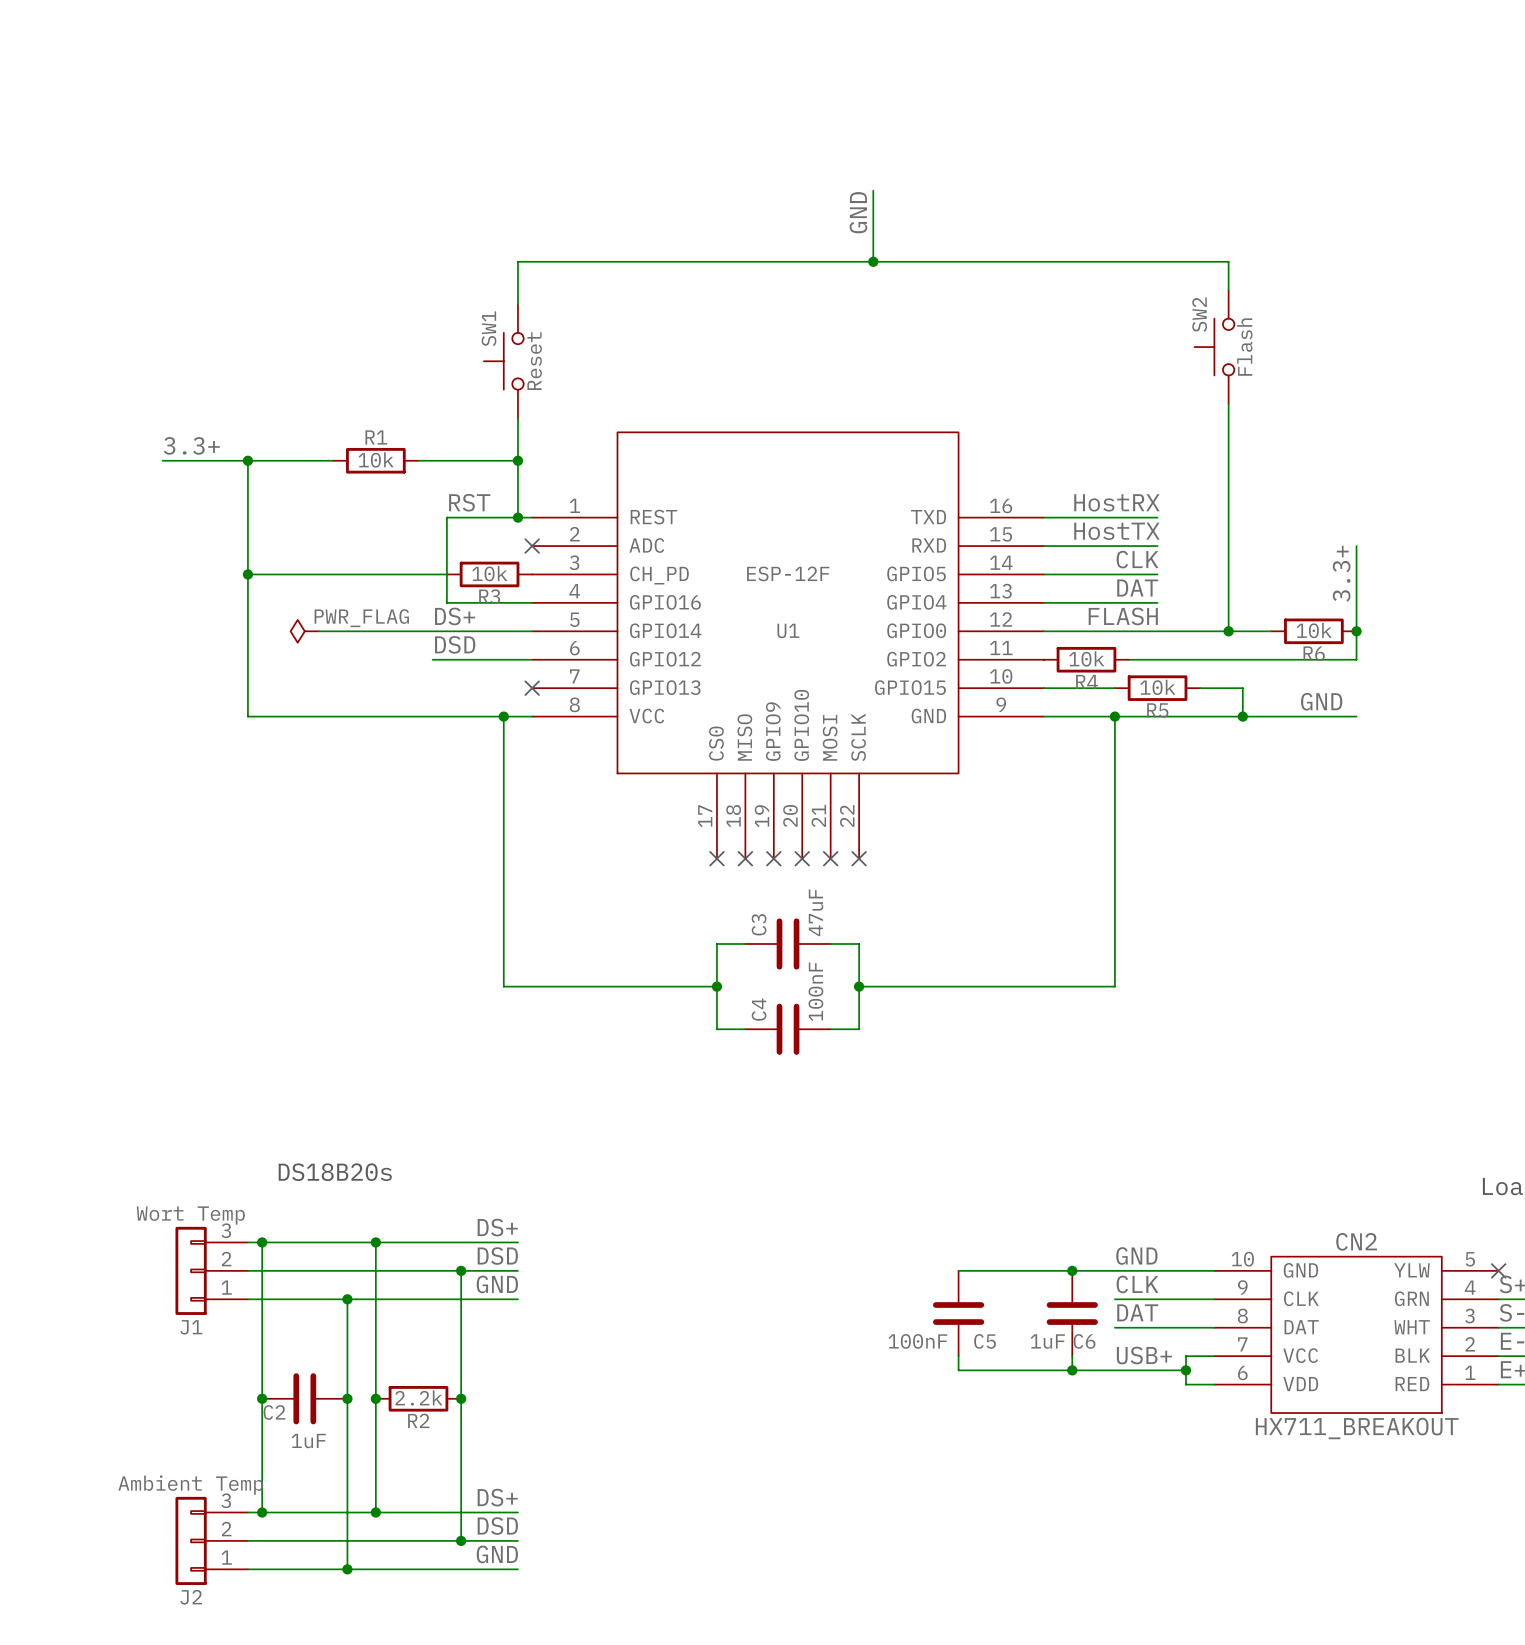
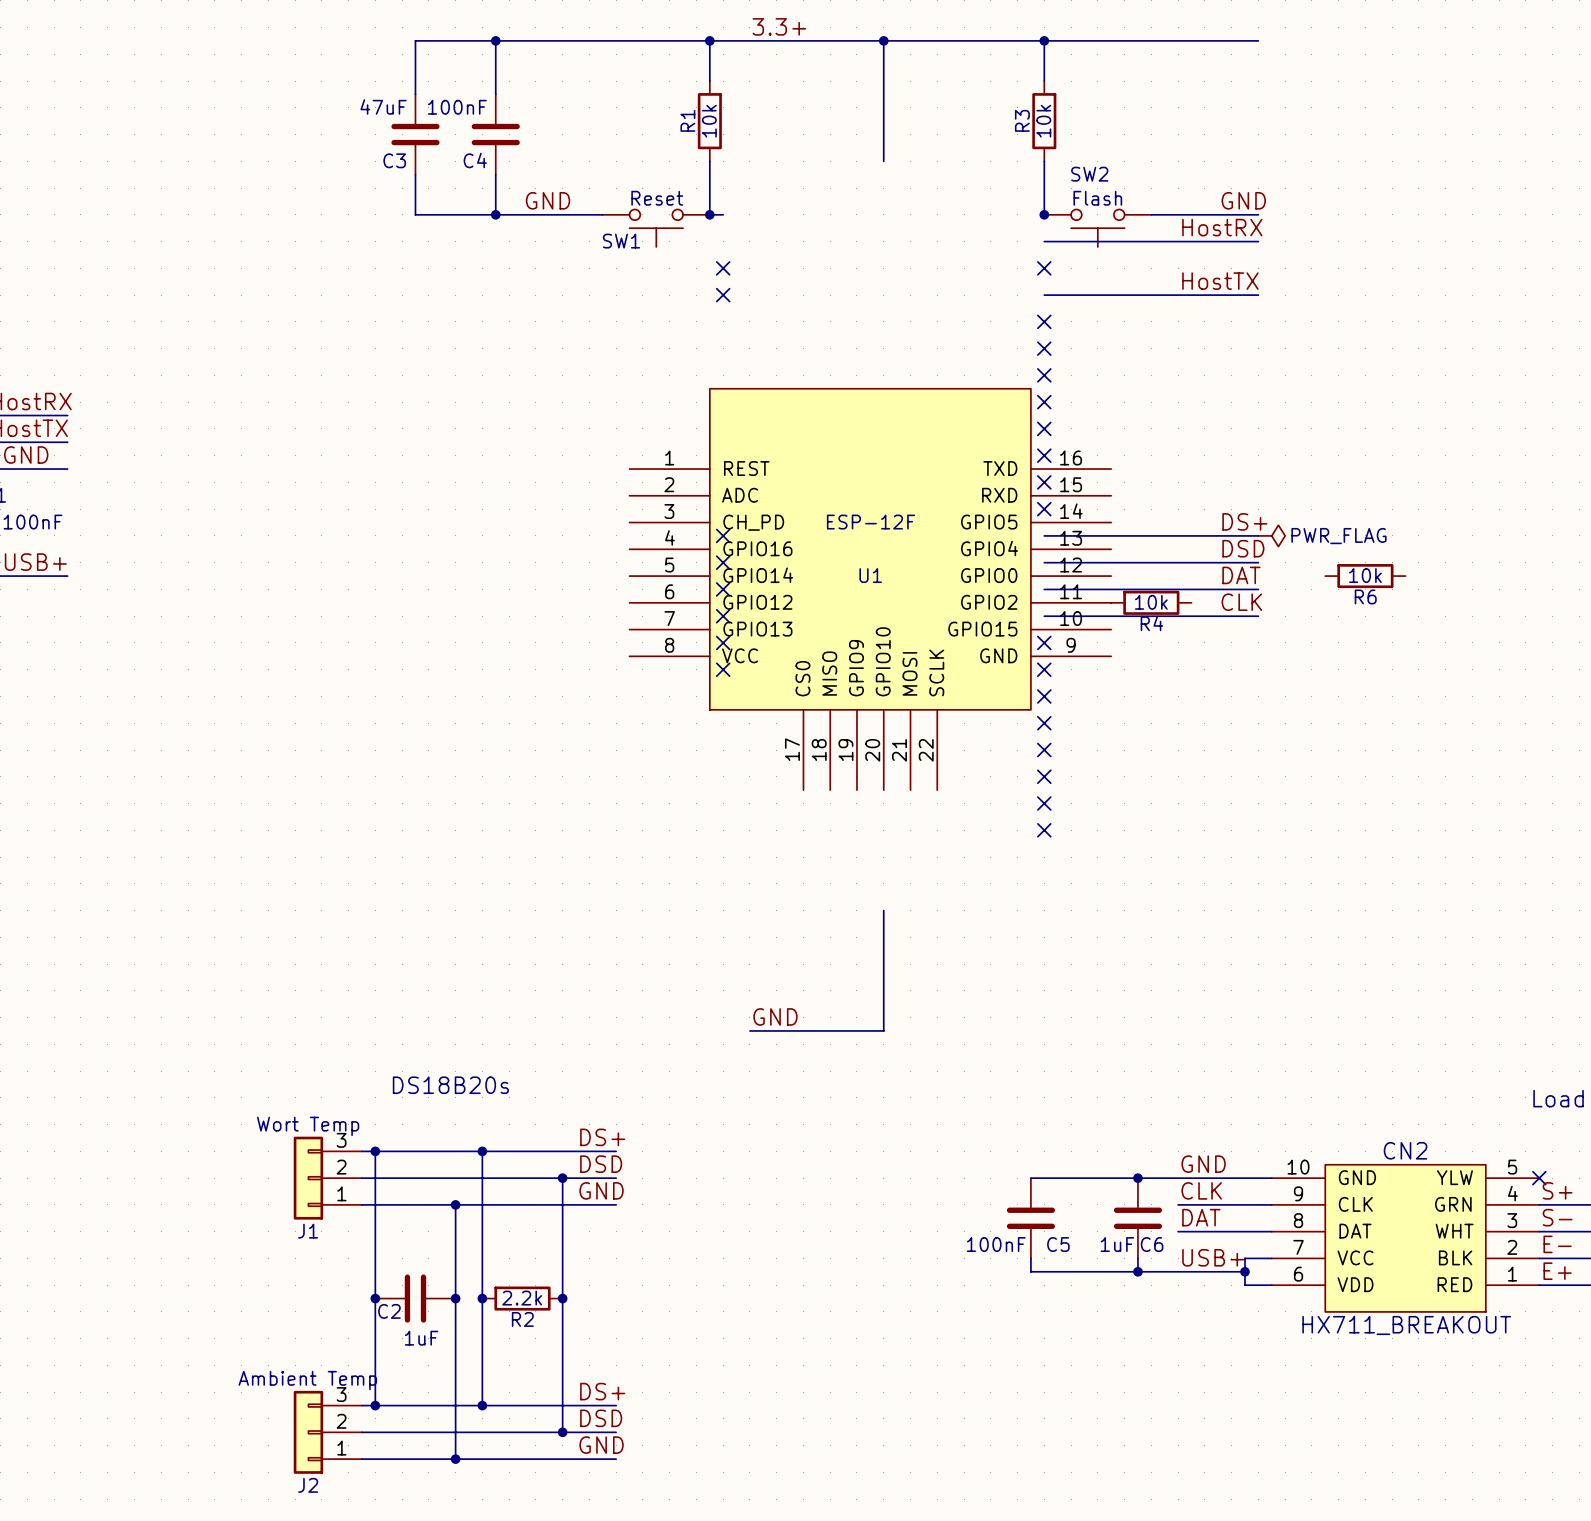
label: none -> 3.3+ (779, 26)
wire: none -> (495, 40) (495, 94)
junction: none -> (495, 40)
wire: none -> (709, 40) (709, 81)
junction: none -> (709, 40)
wire: none -> (883, 40) (883, 161)
junction: none -> (883, 40)
wire: none -> (1044, 40) (1044, 81)
junction: none -> (1044, 40)
wire: none -> (1258, 40) (415, 40) (415, 94)
wire: none -> (709, 161) (709, 214) (723, 214)
wire: (873, 190) (873, 261) -> none
wire: none -> (1044, 161) (1044, 214)
wire: none -> (415, 174) (415, 214) (602, 214)
wire: none -> (495, 174) (495, 214)
label: GND (858, 212) -> none
label: none -> GND (548, 200)
label: none -> GND (1243, 200)
junction: none -> (495, 214)
junction: none -> (709, 214)
junction: none -> (1044, 214)
junction: (873, 261) -> none
wire: none -> (1044, 241) (1258, 241)
wire: (1228, 290) (1228, 261) (517, 261) (517, 304) -> none
no-connect mark: none -> (723, 268)
no-connect mark: none -> (1044, 268)
no-connect mark: none -> (723, 295)
wire: none -> (1044, 295) (1258, 295)
SW2 rotation: 0° (1214, 347) -> 90° counterclockwise (1097, 228)
SW2 position: (1214, 347) -> (1097, 228)
SW1 rotation: 0° (503, 361) -> 90° counterclockwise (656, 228)
SW1 position: (503, 361) -> (656, 228)
no-connect mark: none -> (1044, 321)
no-connect mark: none -> (1044, 348)
wire: (1228, 403) (1228, 631) -> none
wire: (517, 418) (517, 517) -> none
no-connect mark: none -> (1044, 375)
R1 name position: R1 (376, 437) -> R1 (687, 120)
label: 3.3+ (191, 445) -> none
no-connect mark: none -> (1044, 402)
wire: (162, 460) (333, 460) -> none
wire: (247, 460) (247, 716) (532, 716) -> none
junction: (247, 460) -> none
R1 rotation: 0° (375, 460) -> 90° clockwise (709, 121)
R1 position: (375, 460) -> (709, 121)
wire: (418, 460) (517, 460) -> none
junction: (517, 460) -> none
no-connect mark: none -> (1044, 428)
label: RST (469, 502) -> none
label position: HostRX (1116, 502) -> HostRX (1222, 227)
no-connect mark: none -> (1044, 455)
junction: (517, 517) -> none
wire: (532, 517) (446, 517) (446, 602) (532, 602) -> none
wire: (1043, 517) (1157, 517) -> (1151, 214) (1258, 214)
no-connect mark: none -> (1044, 482)
label position: HostTX (1116, 531) -> HostTX (1220, 281)
no-connect mark: (532, 546) -> none
wire: (1043, 546) (1157, 546) -> none
wire: (1356, 546) (1356, 659) (1129, 659) -> none
label position: CLK (1137, 559) -> CLK (1241, 602)
no-connect mark: none -> (1044, 509)
label: none -> DS+ (1244, 521)
label: 3.3+ (1341, 573) -> none
wire: (247, 574) (446, 574) -> none
junction: (247, 574) -> none
R3 rotation: 0° (489, 574) -> 90° clockwise (1044, 121)
R3 position: (489, 574) -> (1044, 121)
wire: (1043, 574) (1157, 574) -> none
no-connect mark: none -> (723, 535)
wire: none -> (1044, 535) (1258, 535)
label position: DAT (1137, 588) -> DAT (1241, 575)
power symbol: none -> PWR_FLAG (1271, 535)
wire: (1043, 602) (1157, 602) -> none
label: none -> DSD (1243, 548)
label: DS+ (455, 616) -> none
label: FLASH (1123, 616) -> none
no-connect mark: none -> (723, 562)
power symbol: PWR_FLAG (304, 631) -> none
wire: (319, 631) (532, 631) -> none
wire: (1043, 631) (1271, 631) -> (1044, 562) (1258, 562)
junction: (1228, 631) -> none
junction: (1356, 631) -> none
label: DSD (455, 644) -> none
no-connect mark: none -> (723, 589)
wire: none -> (1044, 589) (1258, 589)
wire: (432, 659) (532, 659) -> none
no-connect mark: none -> (723, 616)
wire: none -> (1044, 616) (1258, 616)
no-connect mark: (532, 688) -> none
wire: (1043, 688) (1114, 688) -> none
R5: 10k (1157, 688) -> none
wire: (1200, 688) (1242, 688) (1242, 716) -> none
label: GND (1321, 701) -> none
no-connect mark: none -> (723, 642)
no-connect mark: none -> (1044, 642)
wire: (503, 716) (503, 986) (716, 986) -> none
junction: (503, 716) -> none
wire: (1043, 716) (1356, 716) -> none
wire: (1114, 716) (1114, 986) (859, 986) -> none
junction: (1114, 716) -> none
junction: (1242, 716) -> none
no-connect mark: none -> (723, 669)
no-connect mark: none -> (1044, 669)
no-connect mark: none -> (1044, 696)
no-connect mark: none -> (1044, 723)
no-connect mark: none -> (1044, 750)
no-connect mark: none -> (1044, 776)
no-connect mark: (716, 858) -> none
no-connect mark: (745, 858) -> none
no-connect mark: (773, 858) -> none
no-connect mark: (802, 858) -> none
no-connect mark: (830, 858) -> none
no-connect mark: (859, 858) -> none
no-connect mark: none -> (1044, 803)
no-connect mark: none -> (1044, 830)
C3 value position: 47uF (816, 912) -> 47uF (383, 106)
C3 name position: C3 (759, 924) -> C3 (394, 160)
wire: (745, 943) (716, 943) (716, 1029) (745, 1029) -> none
C3 rotation: 0° (788, 943) -> 90° clockwise (415, 134)
C3 position: (788, 943) -> (415, 134)
wire: (830, 943) (859, 943) (859, 1029) (830, 1029) -> none
junction: (716, 986) -> none
wire: none -> (883, 910) (883, 1030) (749, 1030)
junction: (859, 986) -> none
C4 value position: 100nF (815, 991) -> 100nF (457, 107)
C4 name position: C4 (759, 1009) -> C4 (475, 160)
C4 rotation: 0° (788, 1029) -> 90° clockwise (495, 134)
C4 position: (788, 1029) -> (495, 134)
label: none -> GND (775, 1016)

